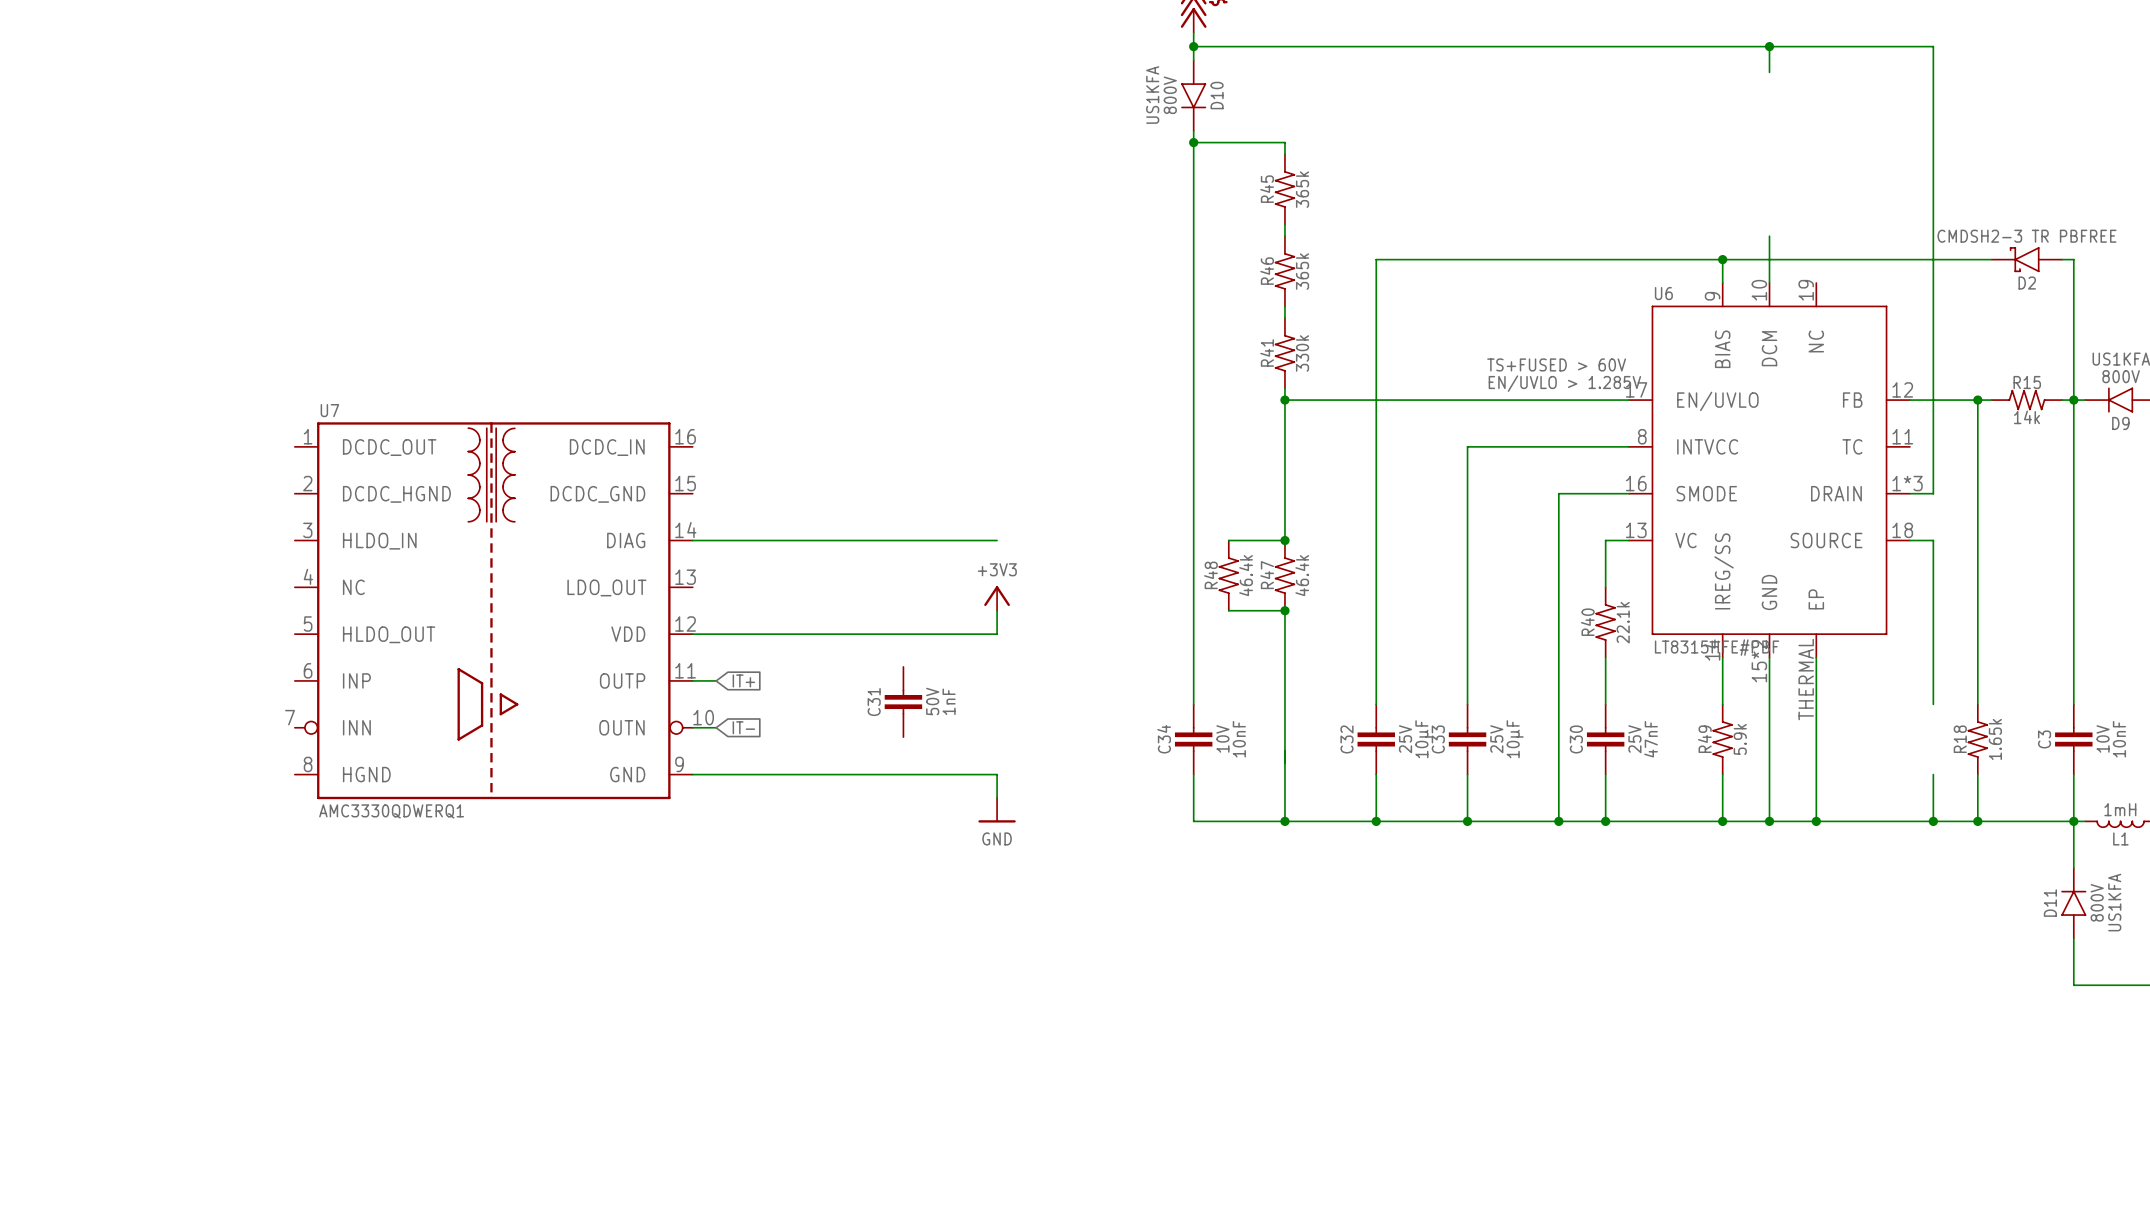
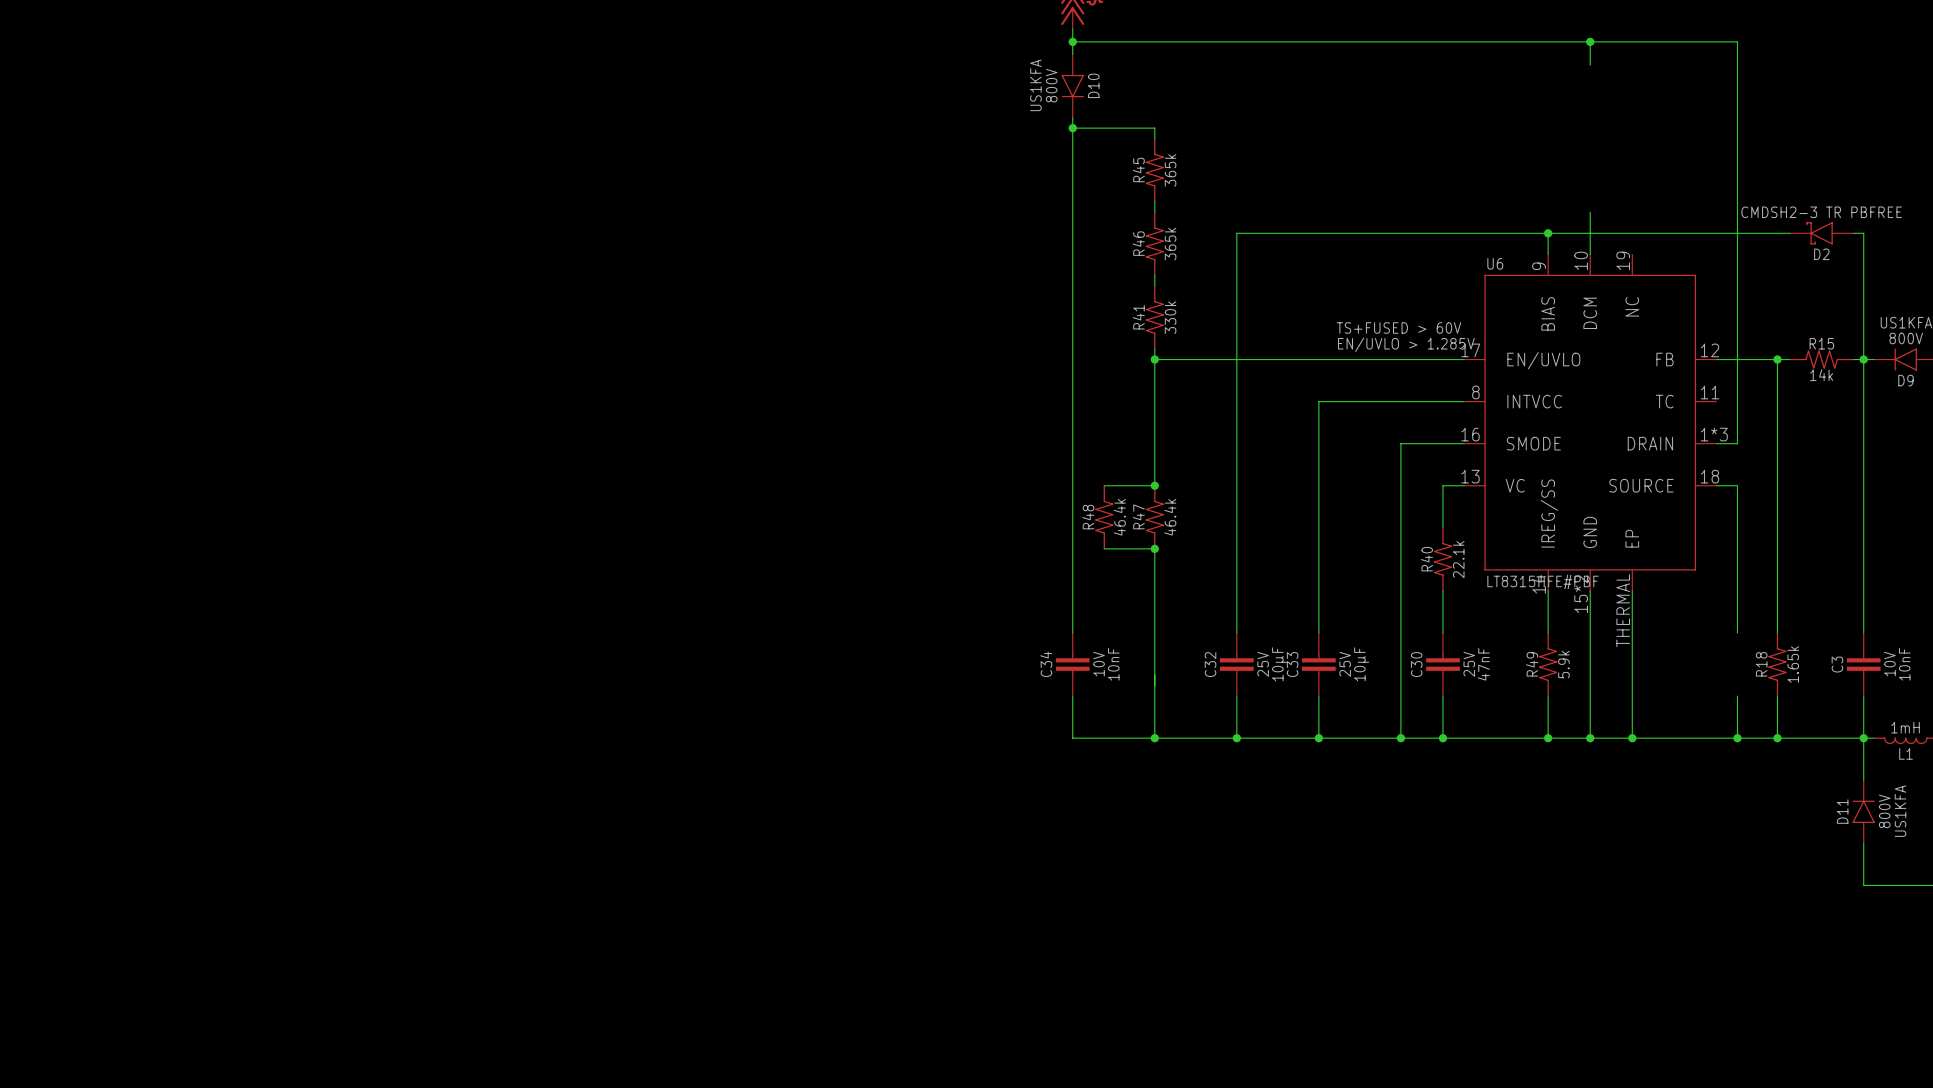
wire: (692, 540) (997, 540) -> none
power symbol: +3V3 (997, 598) -> none
U7: (493, 610) -> none
wire: (997, 610) (997, 634) (692, 634) -> none
wire: (692, 680) (716, 680) -> none
global label: IT+ (743, 680) -> none
C31: (903, 702) -> none
wire: (692, 727) (716, 727) -> none
global label: IT- (743, 727) -> none
wire: (692, 774) (997, 774) (997, 797) -> none
power symbol: GND (997, 810) -> none

